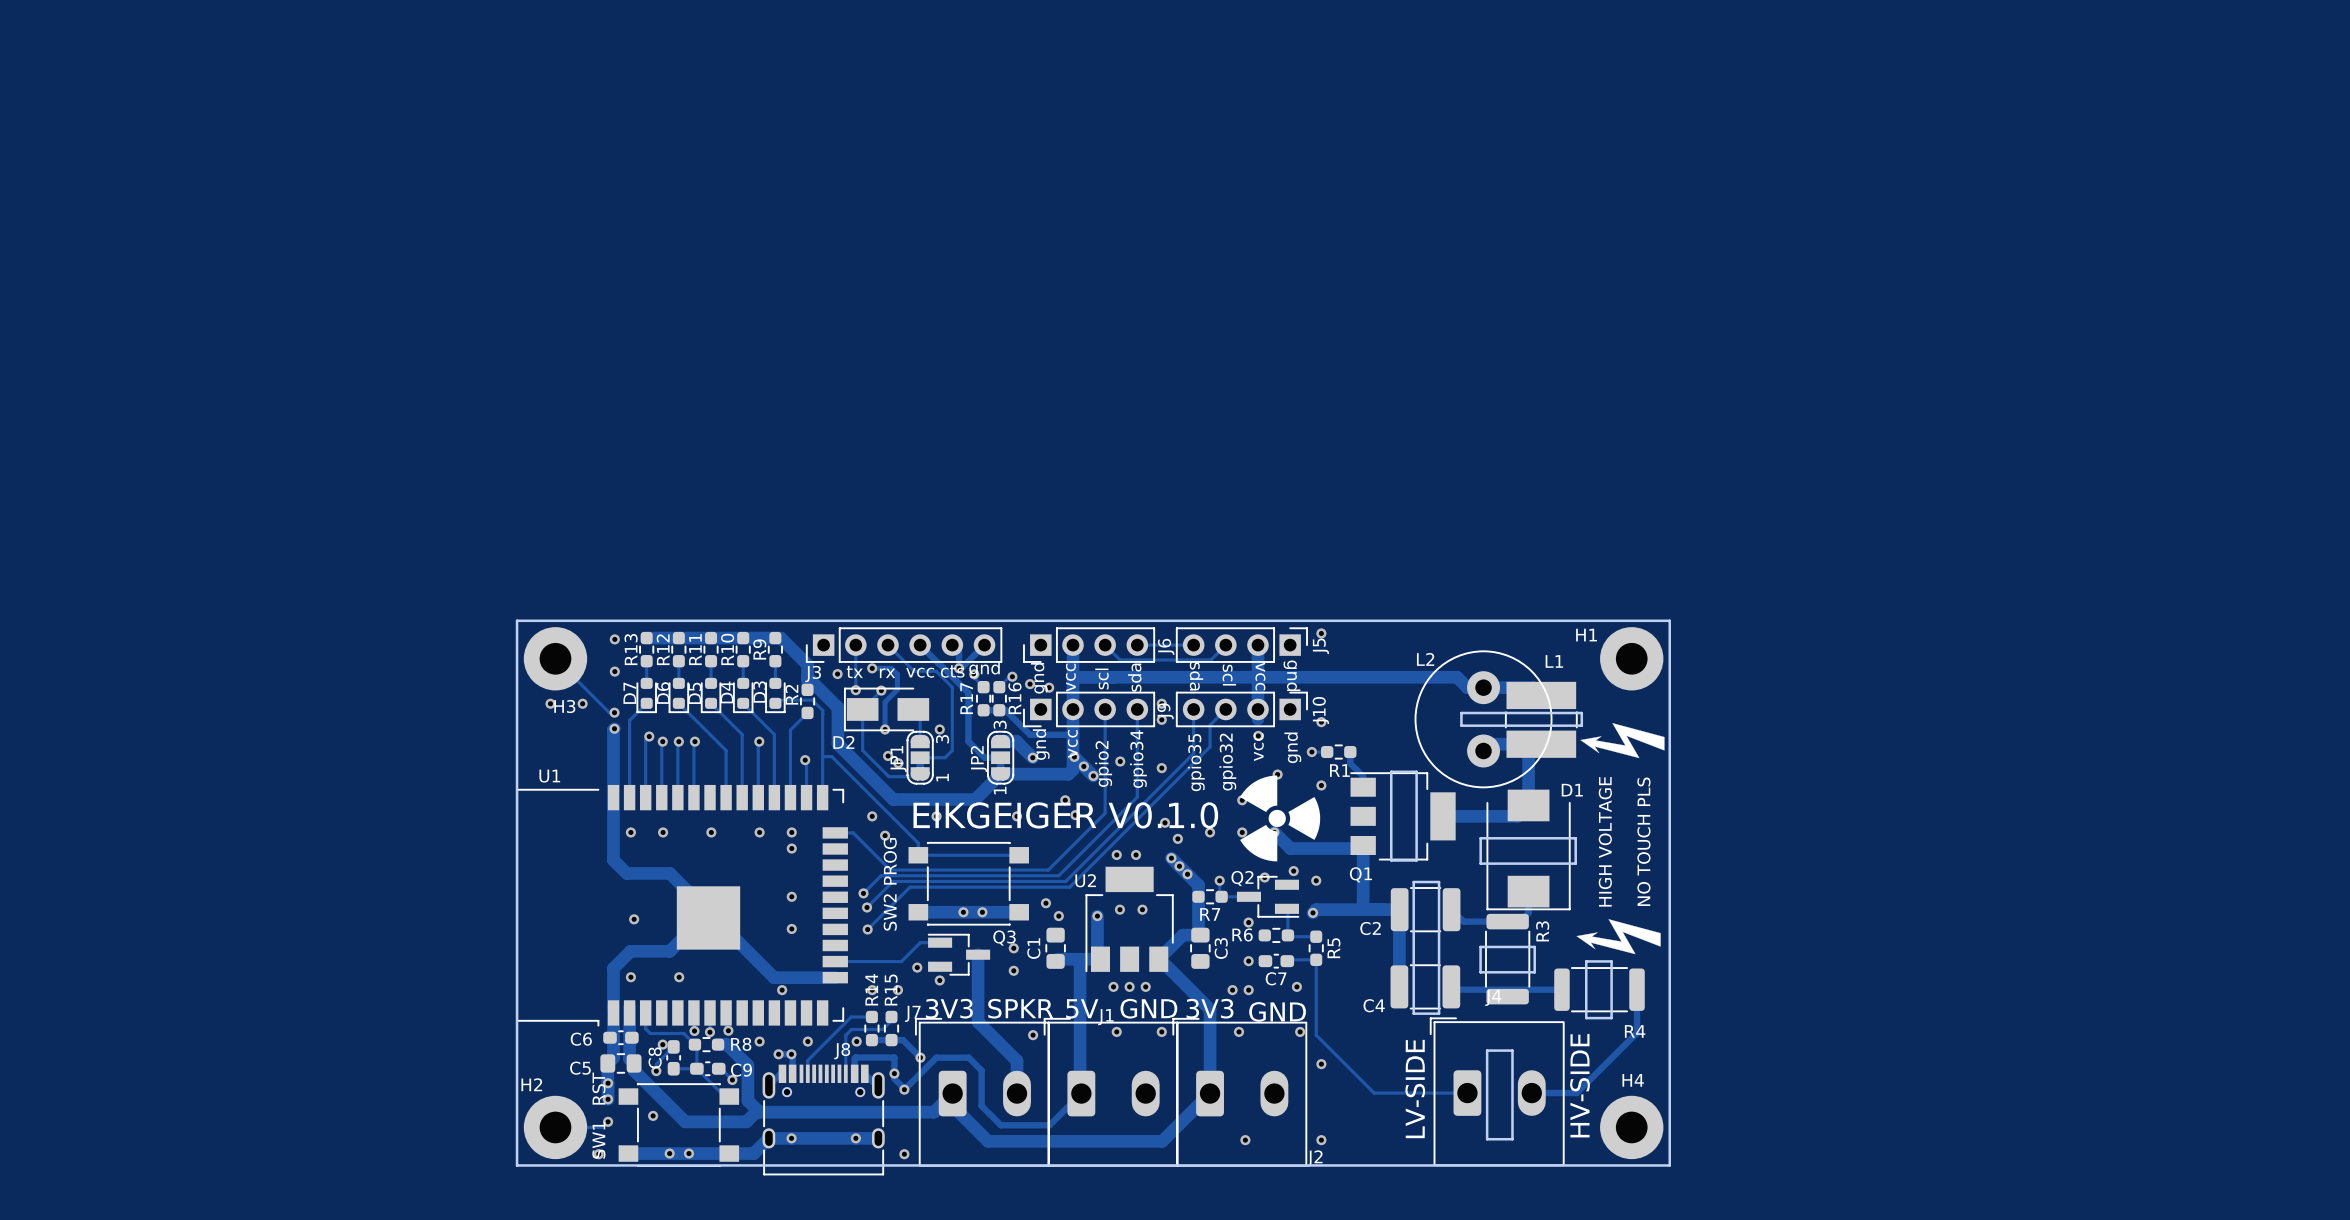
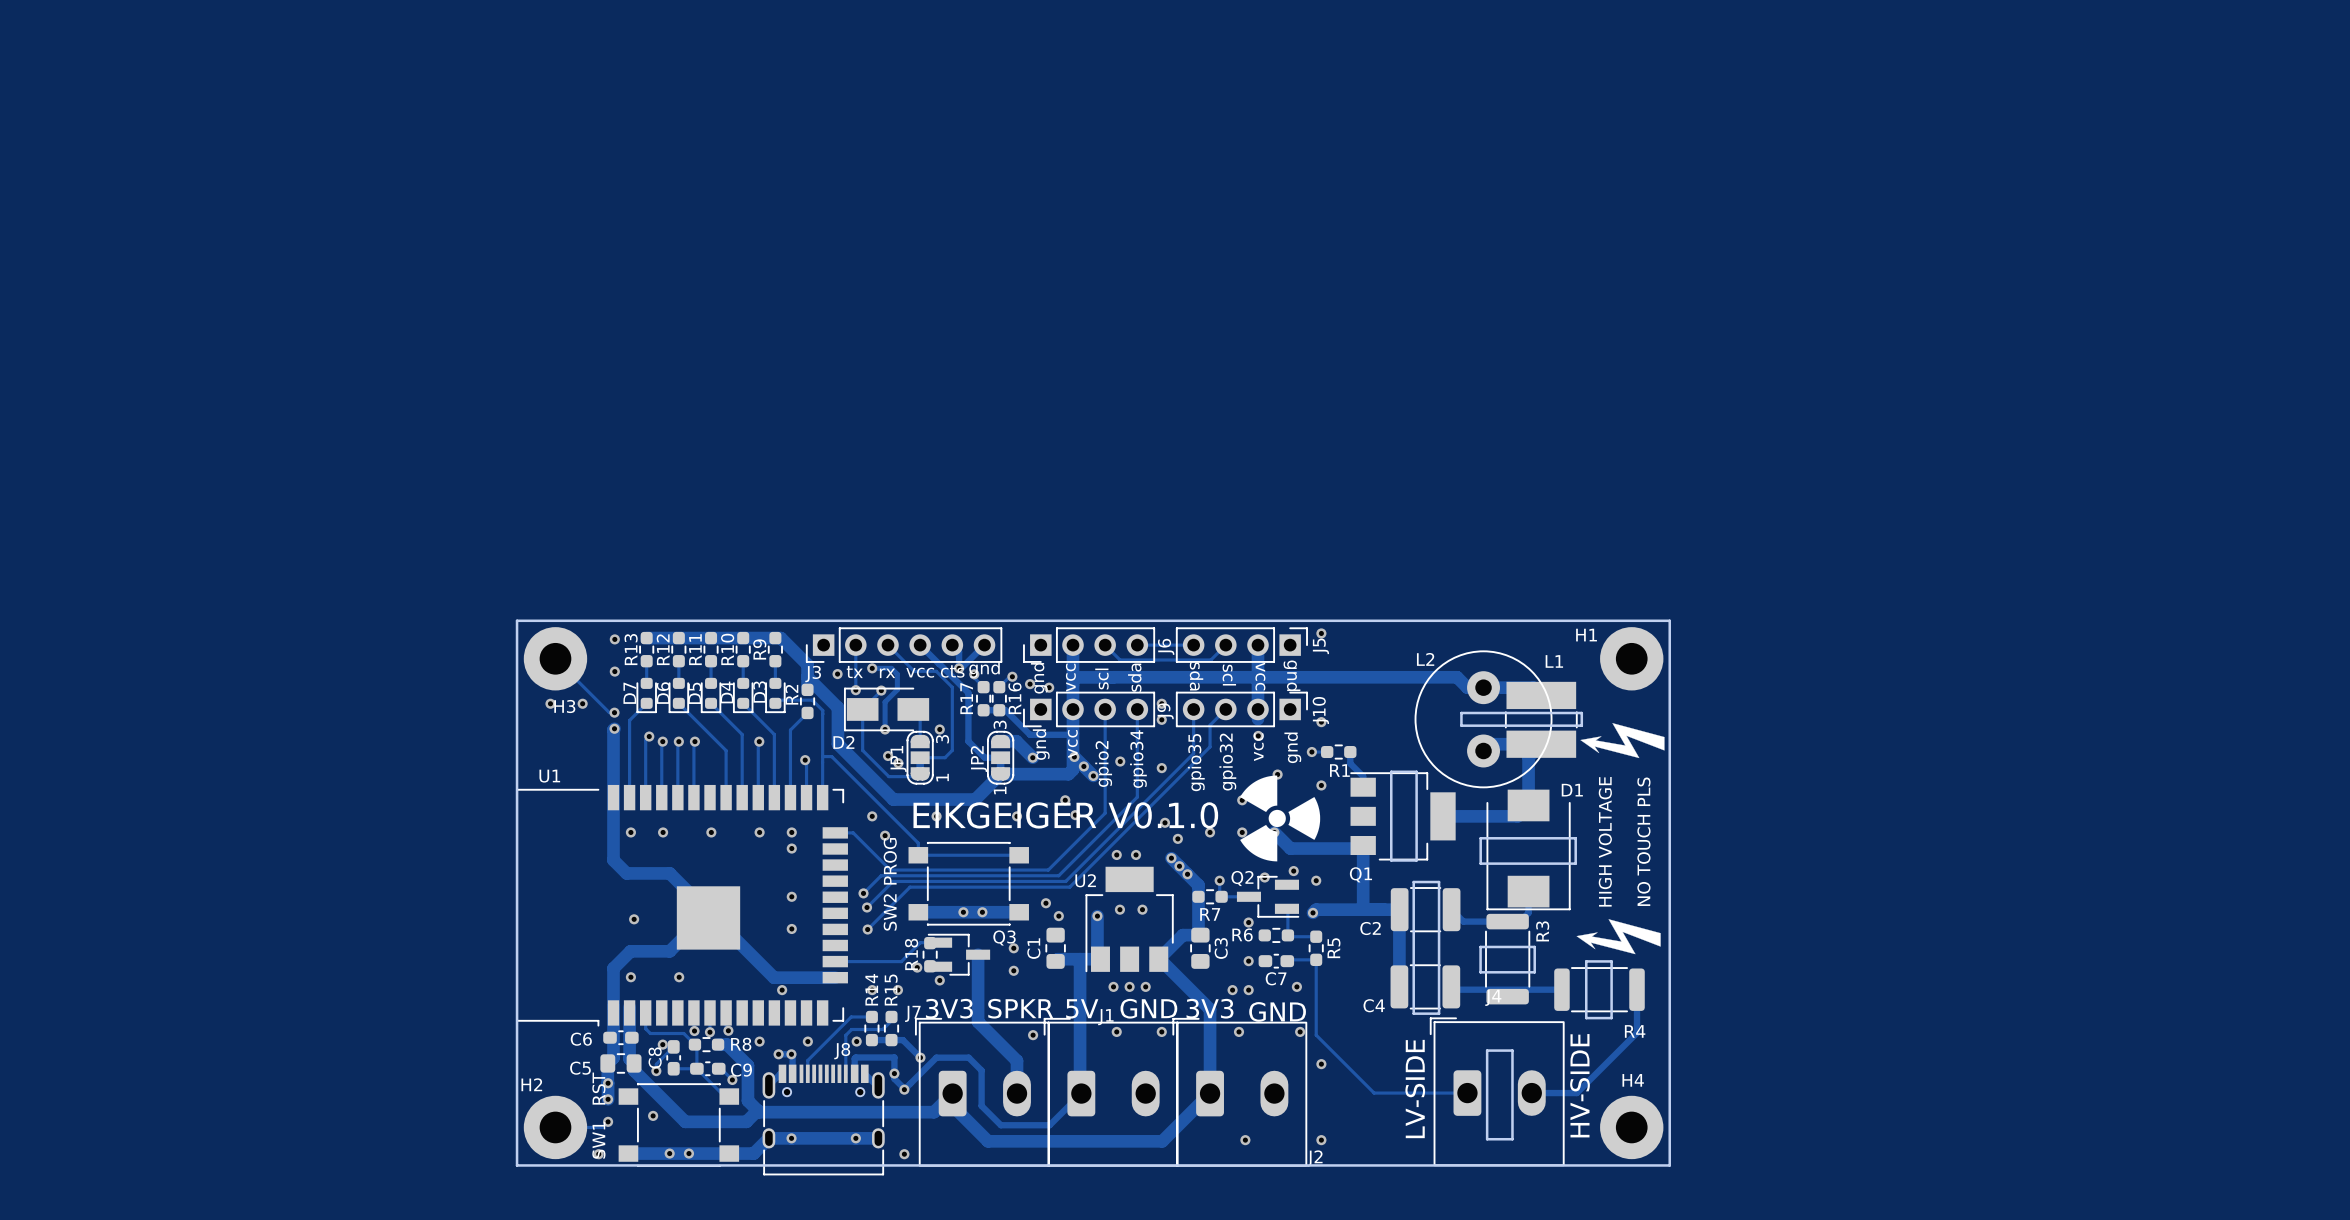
R18: none -> (930, 954)

